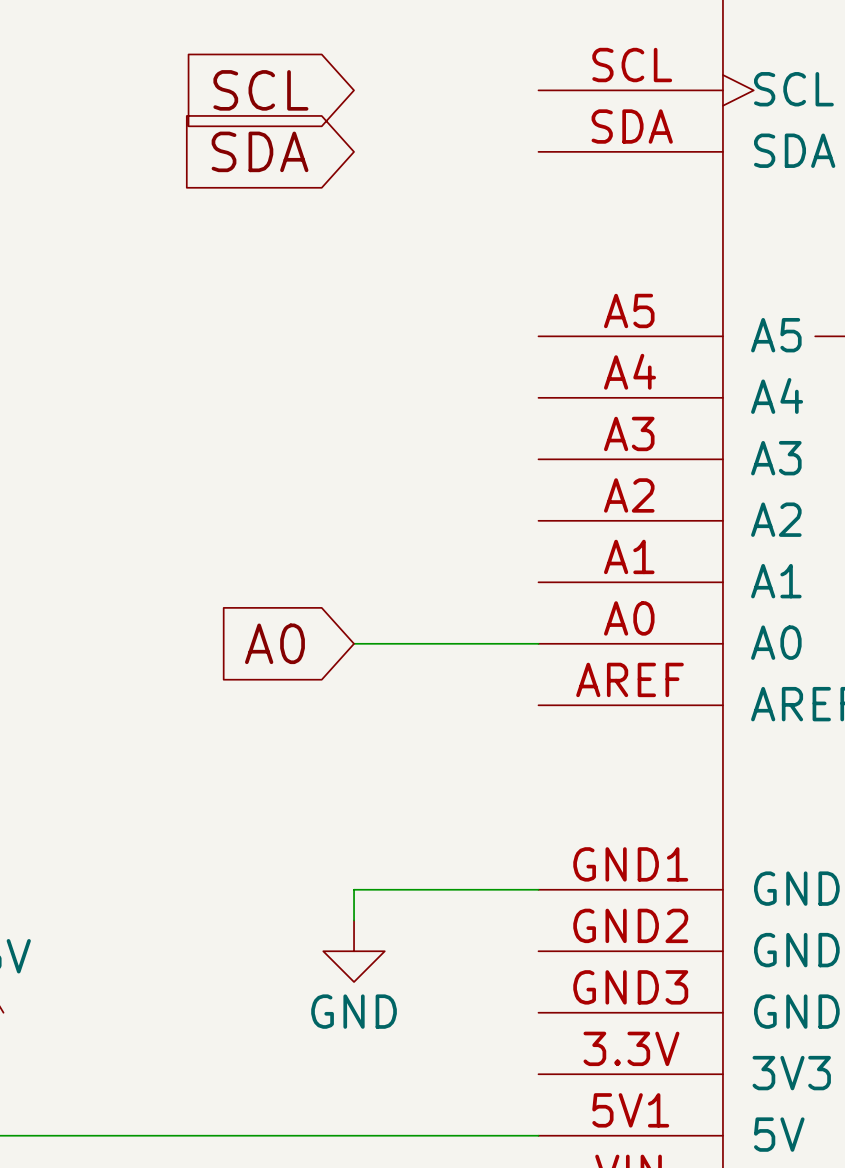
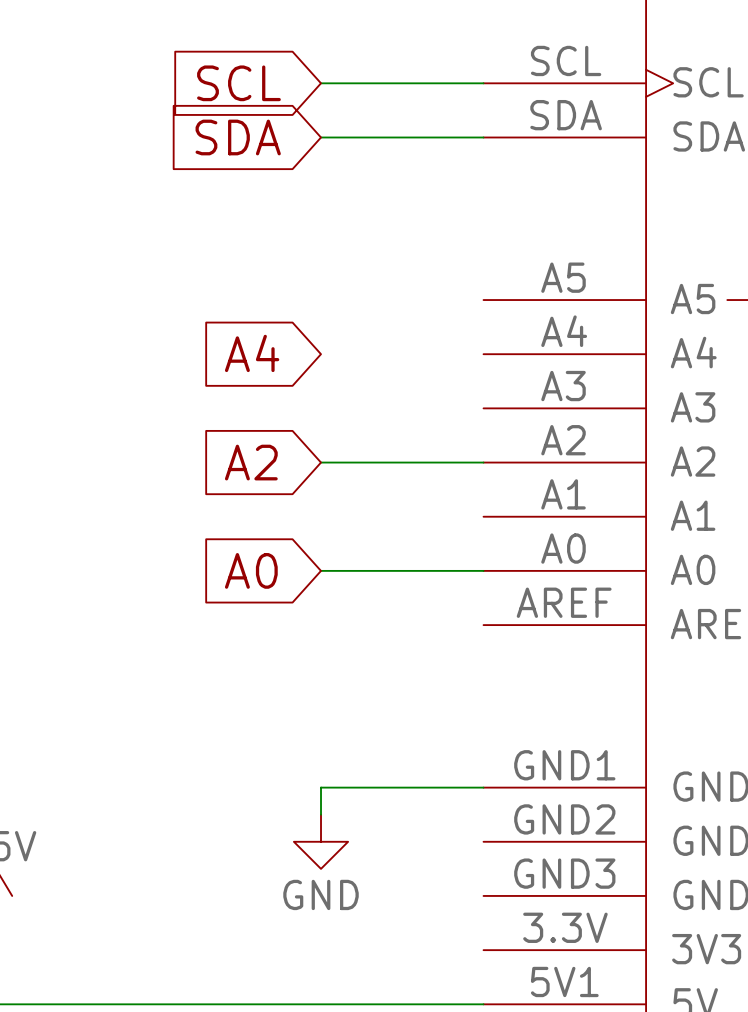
wire: none -> (321, 83) (483, 83)
wire: none -> (321, 137) (483, 137)
global label: none -> A4 (252, 353)
global label: none -> A2 (251, 462)
wire: none -> (321, 462) (483, 462)

